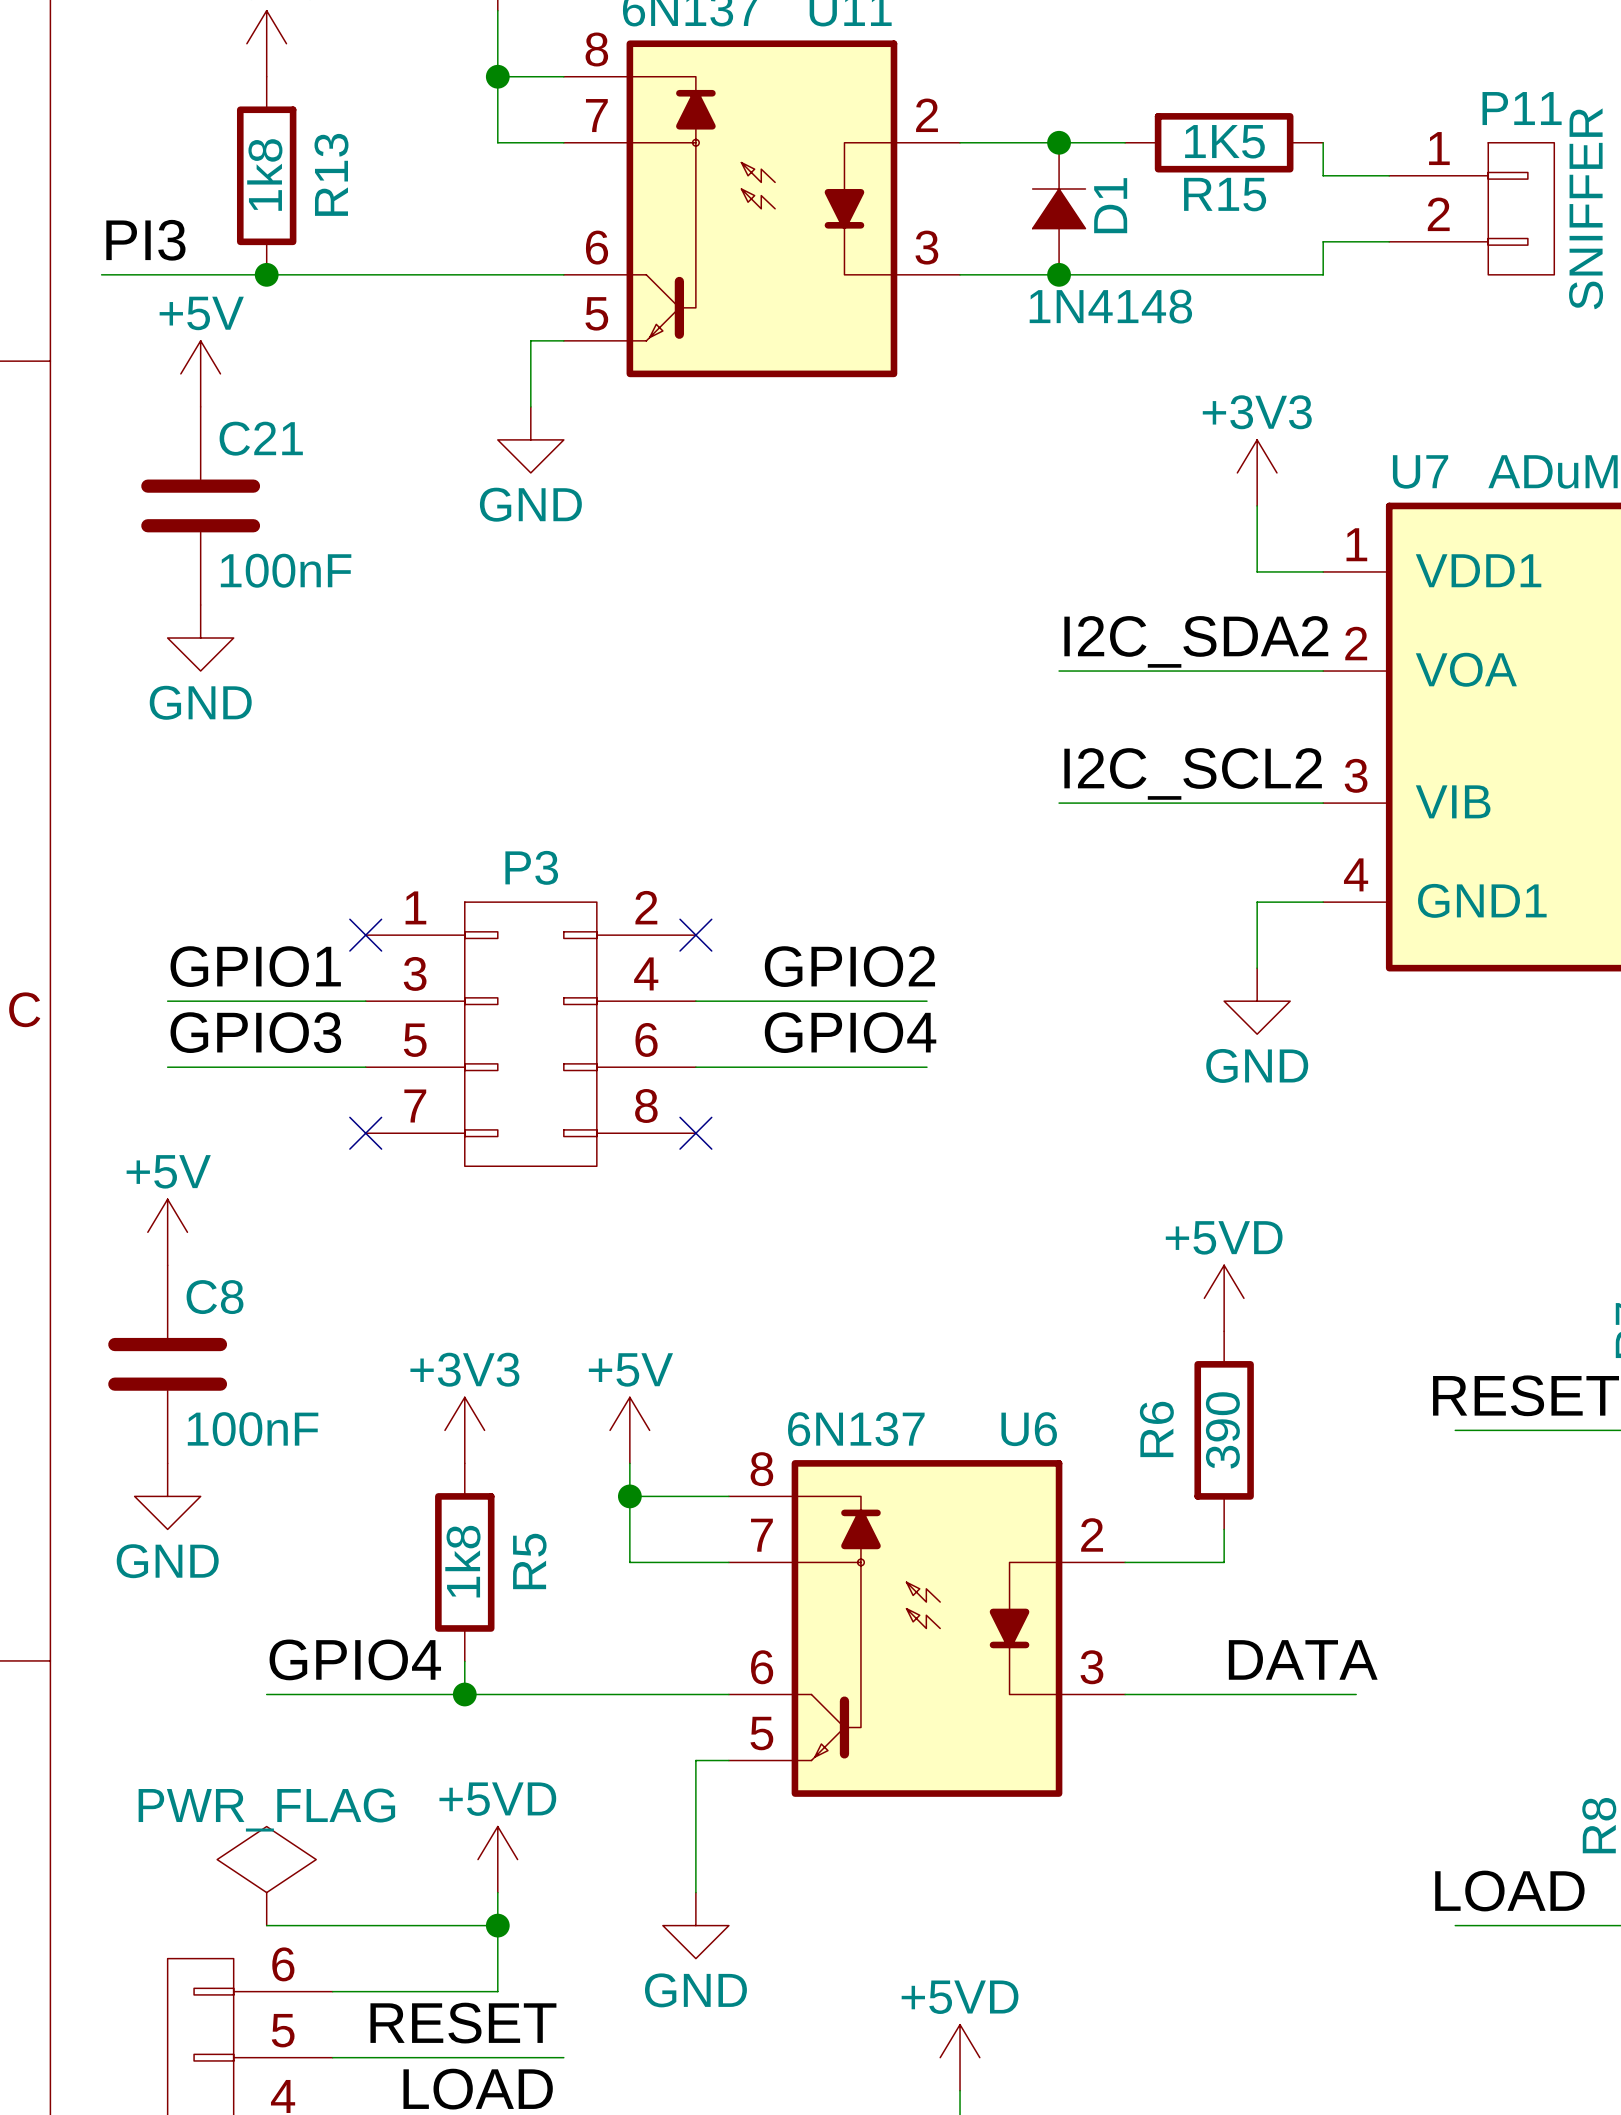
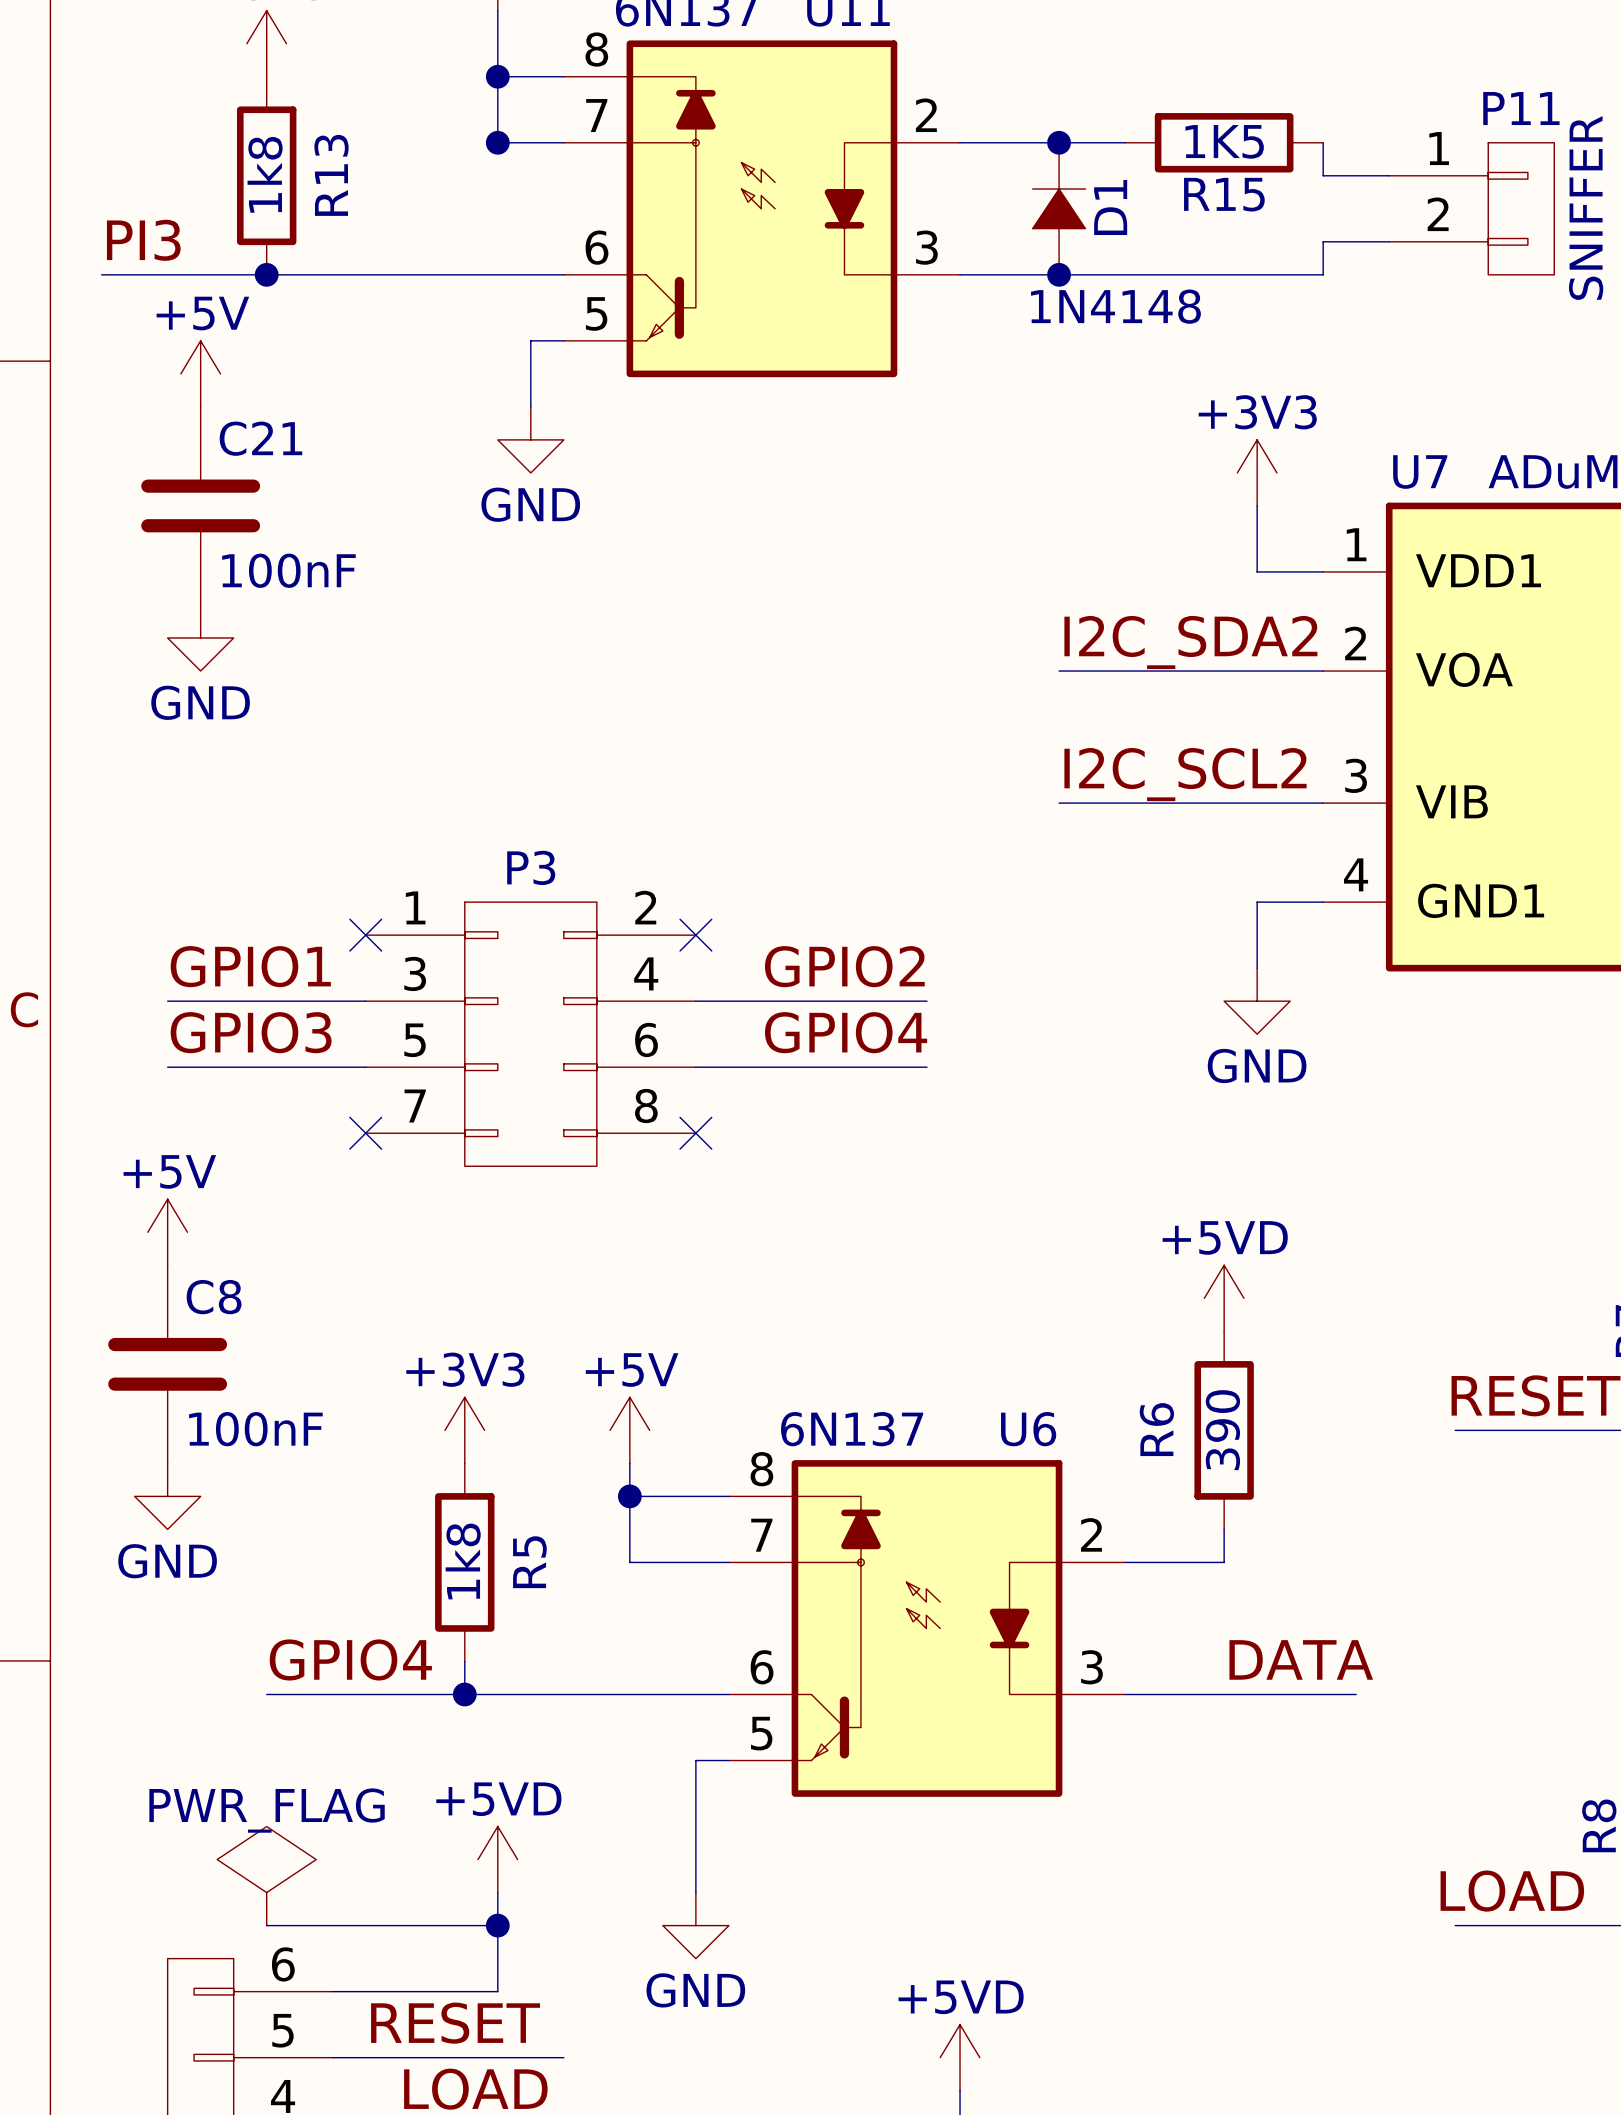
junction: none -> (497, 142)

